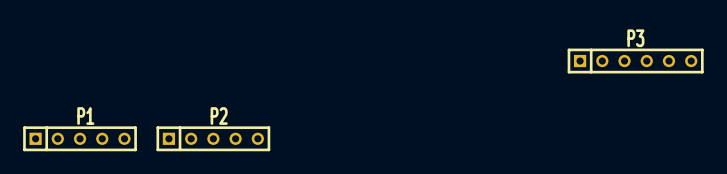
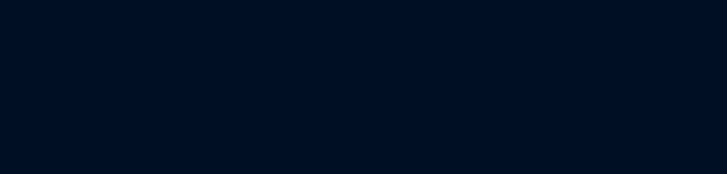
P3: (635, 61) -> none
P1: (80, 138) -> none
P2: (213, 138) -> none

